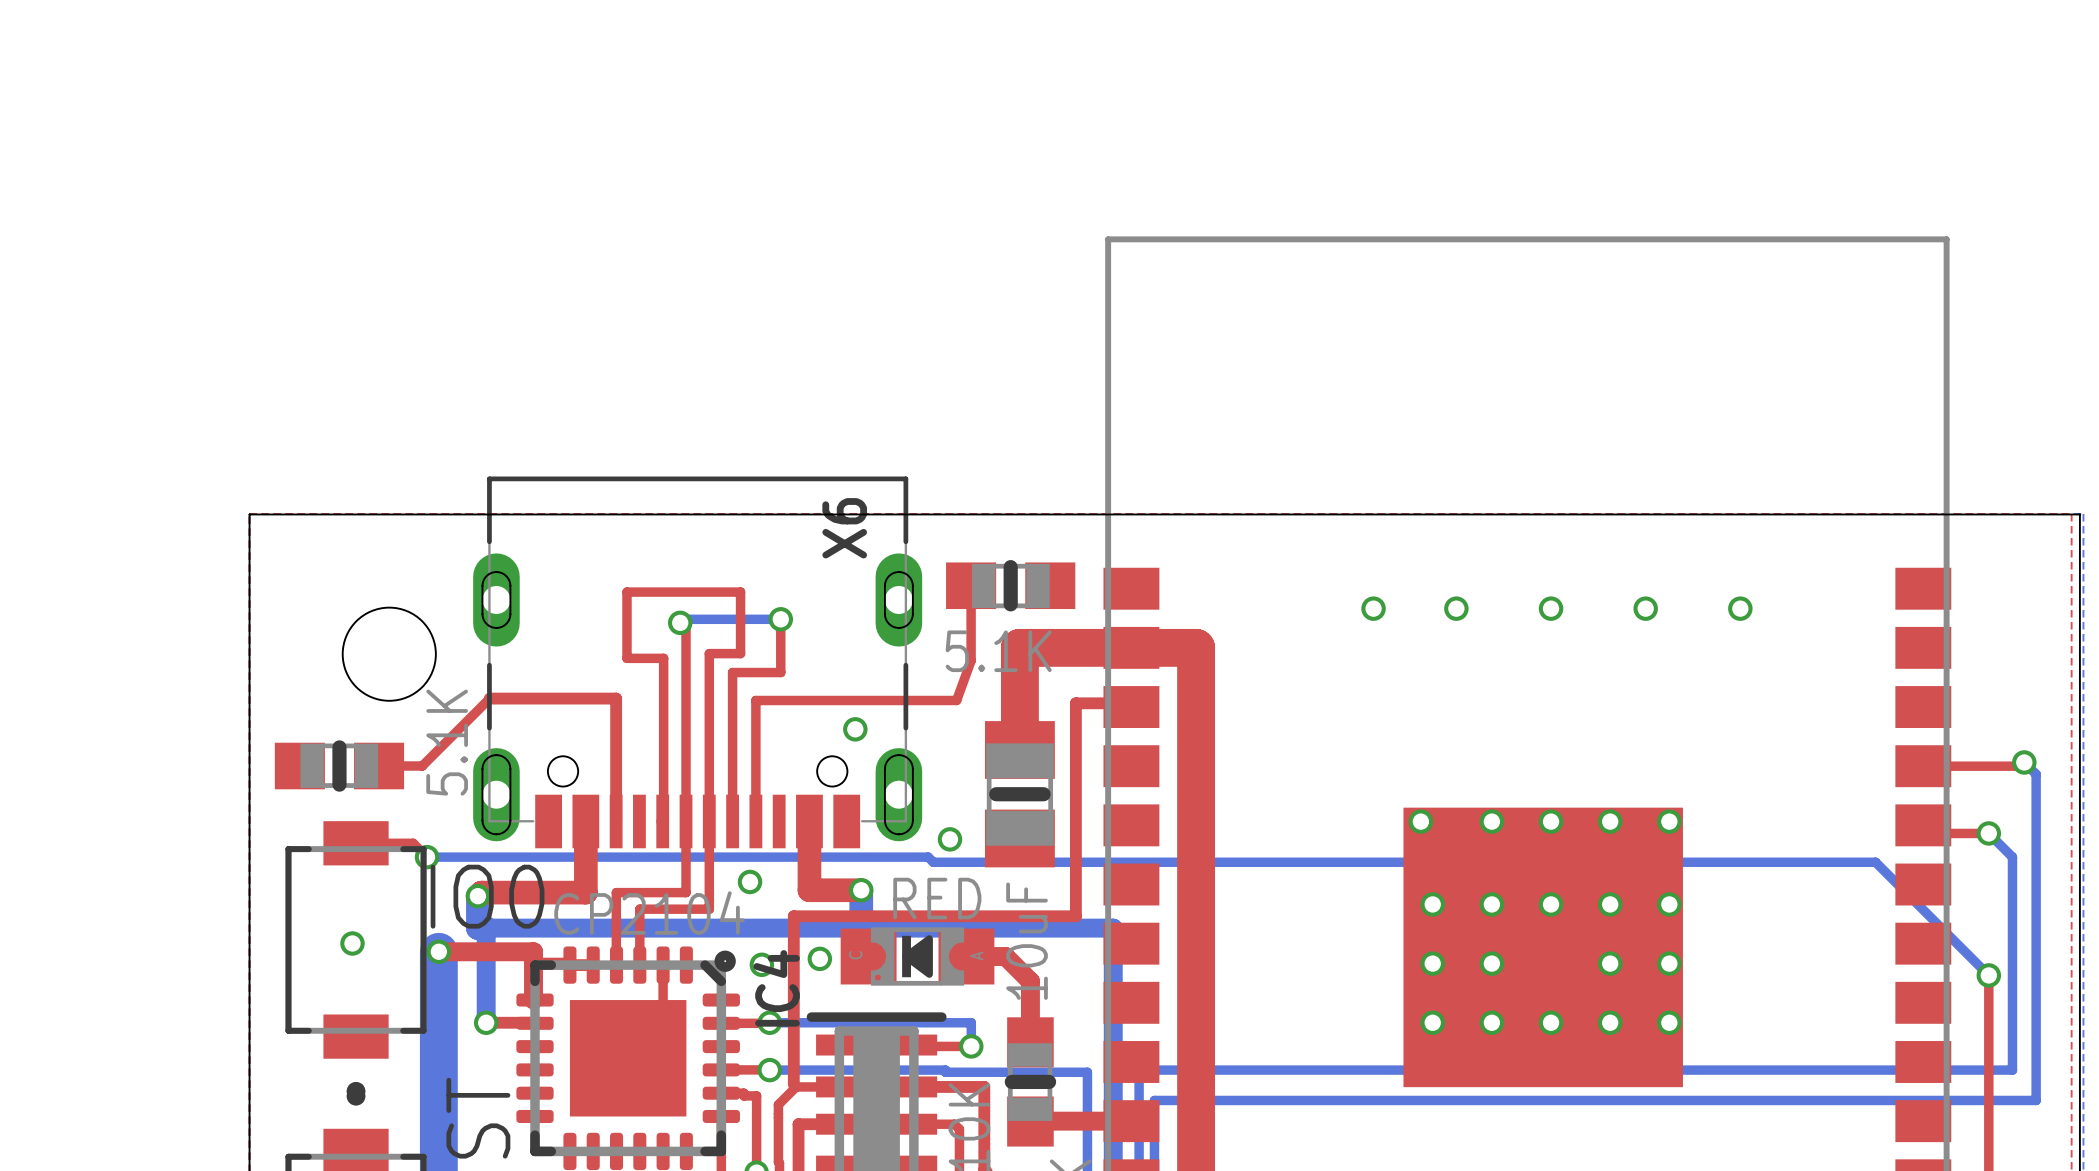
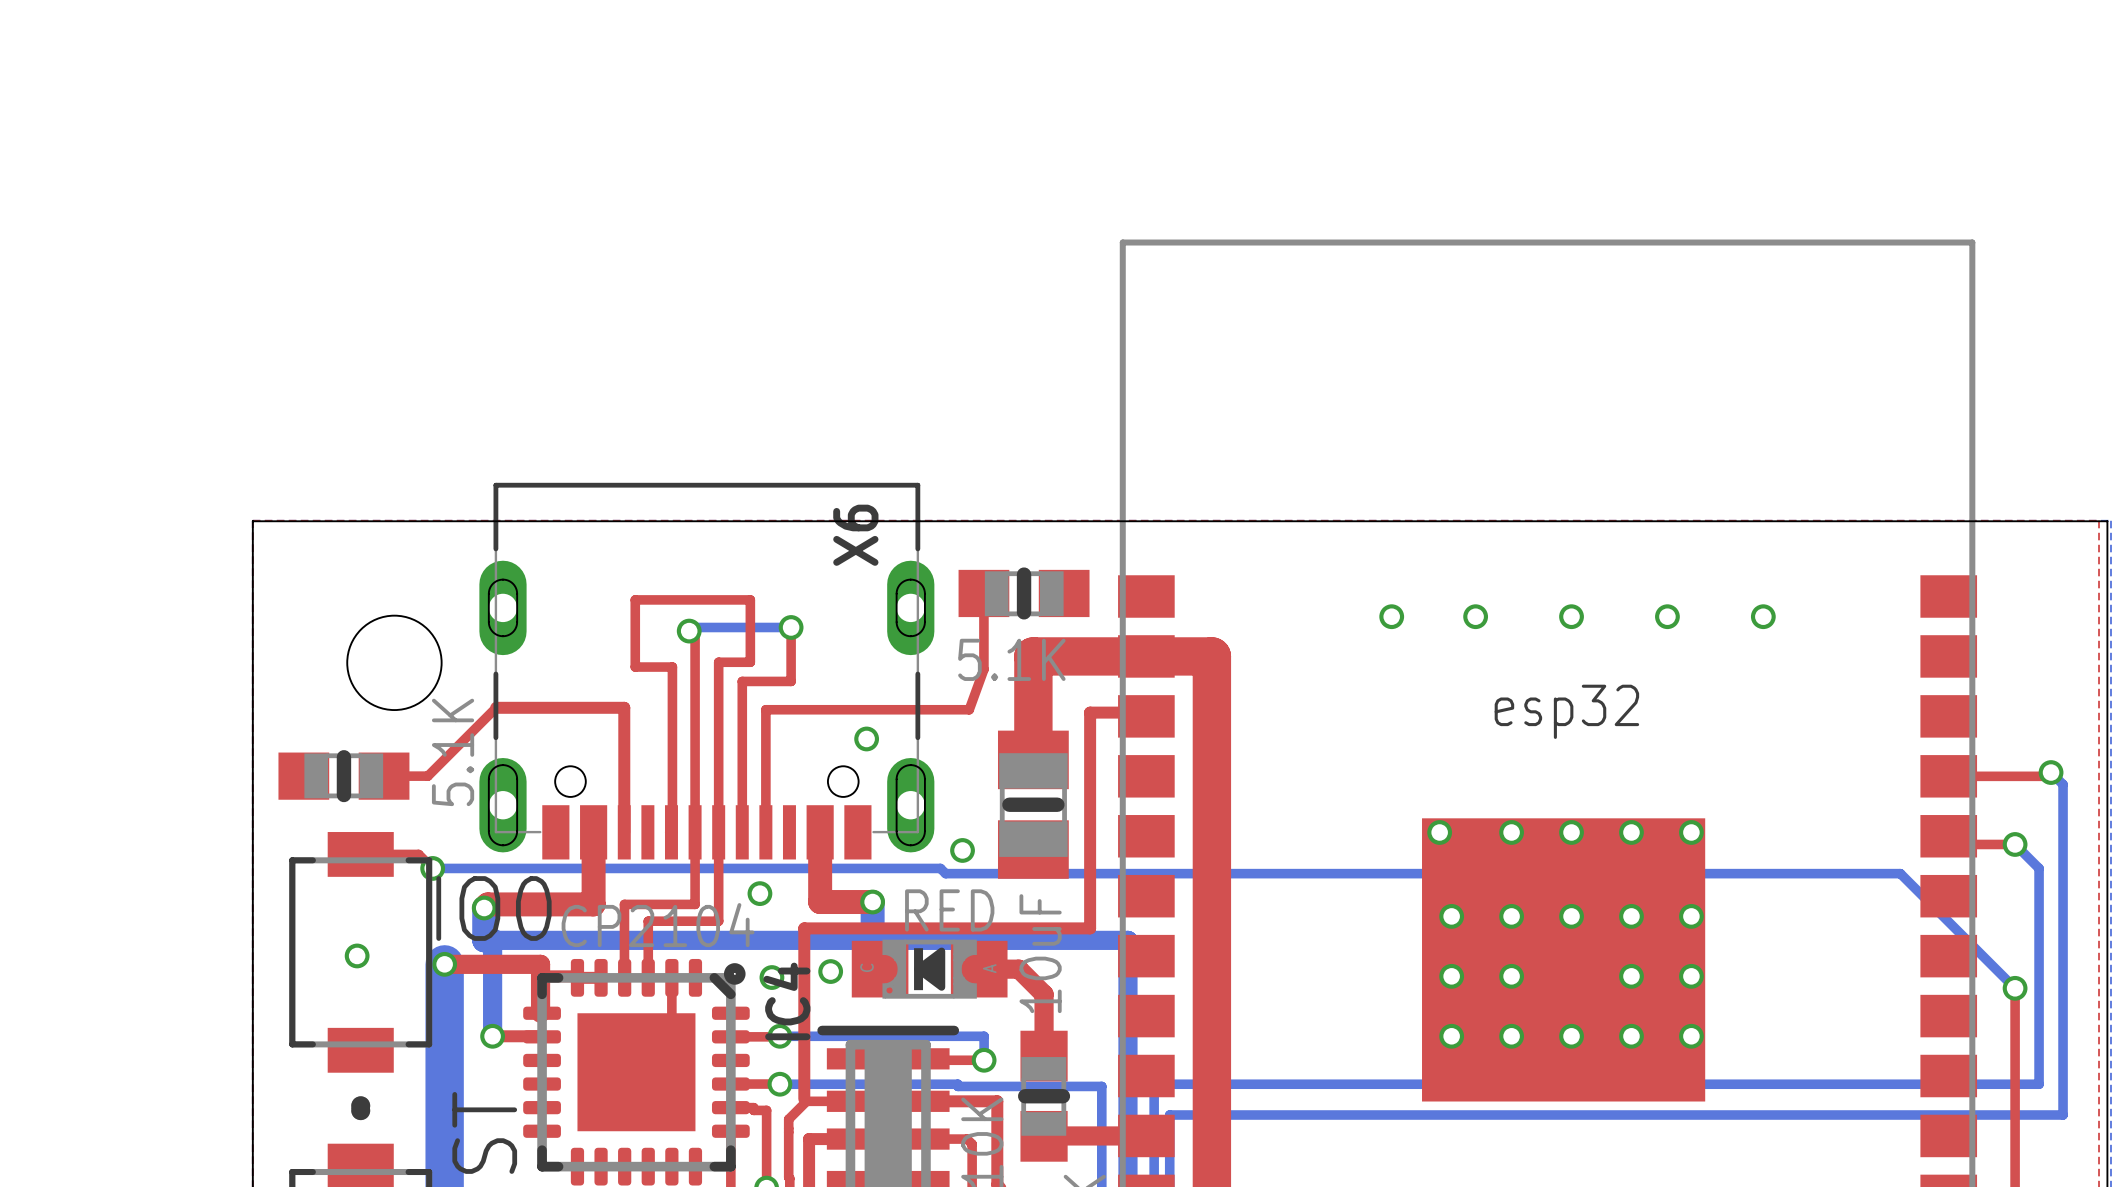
text: none -> esp32 (1566, 711)

